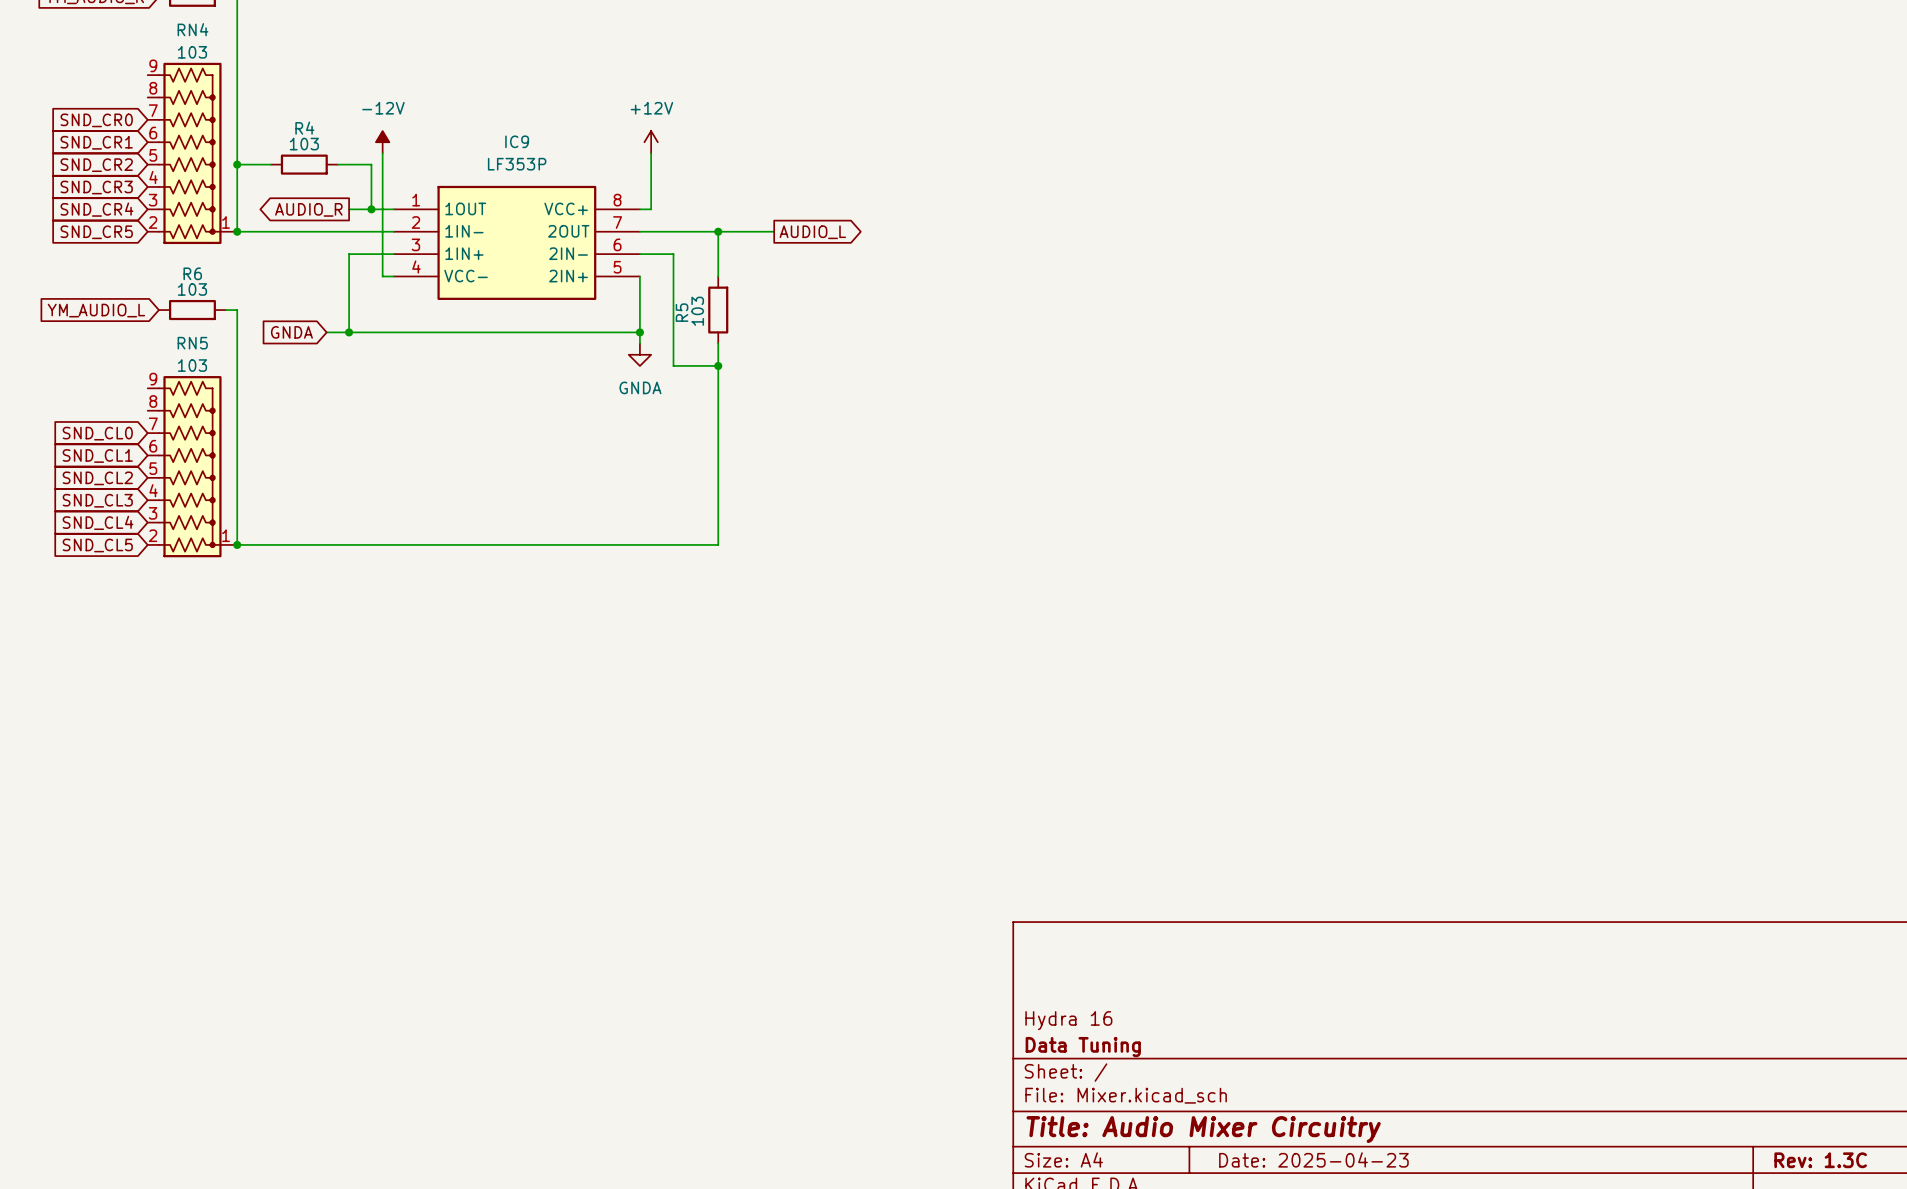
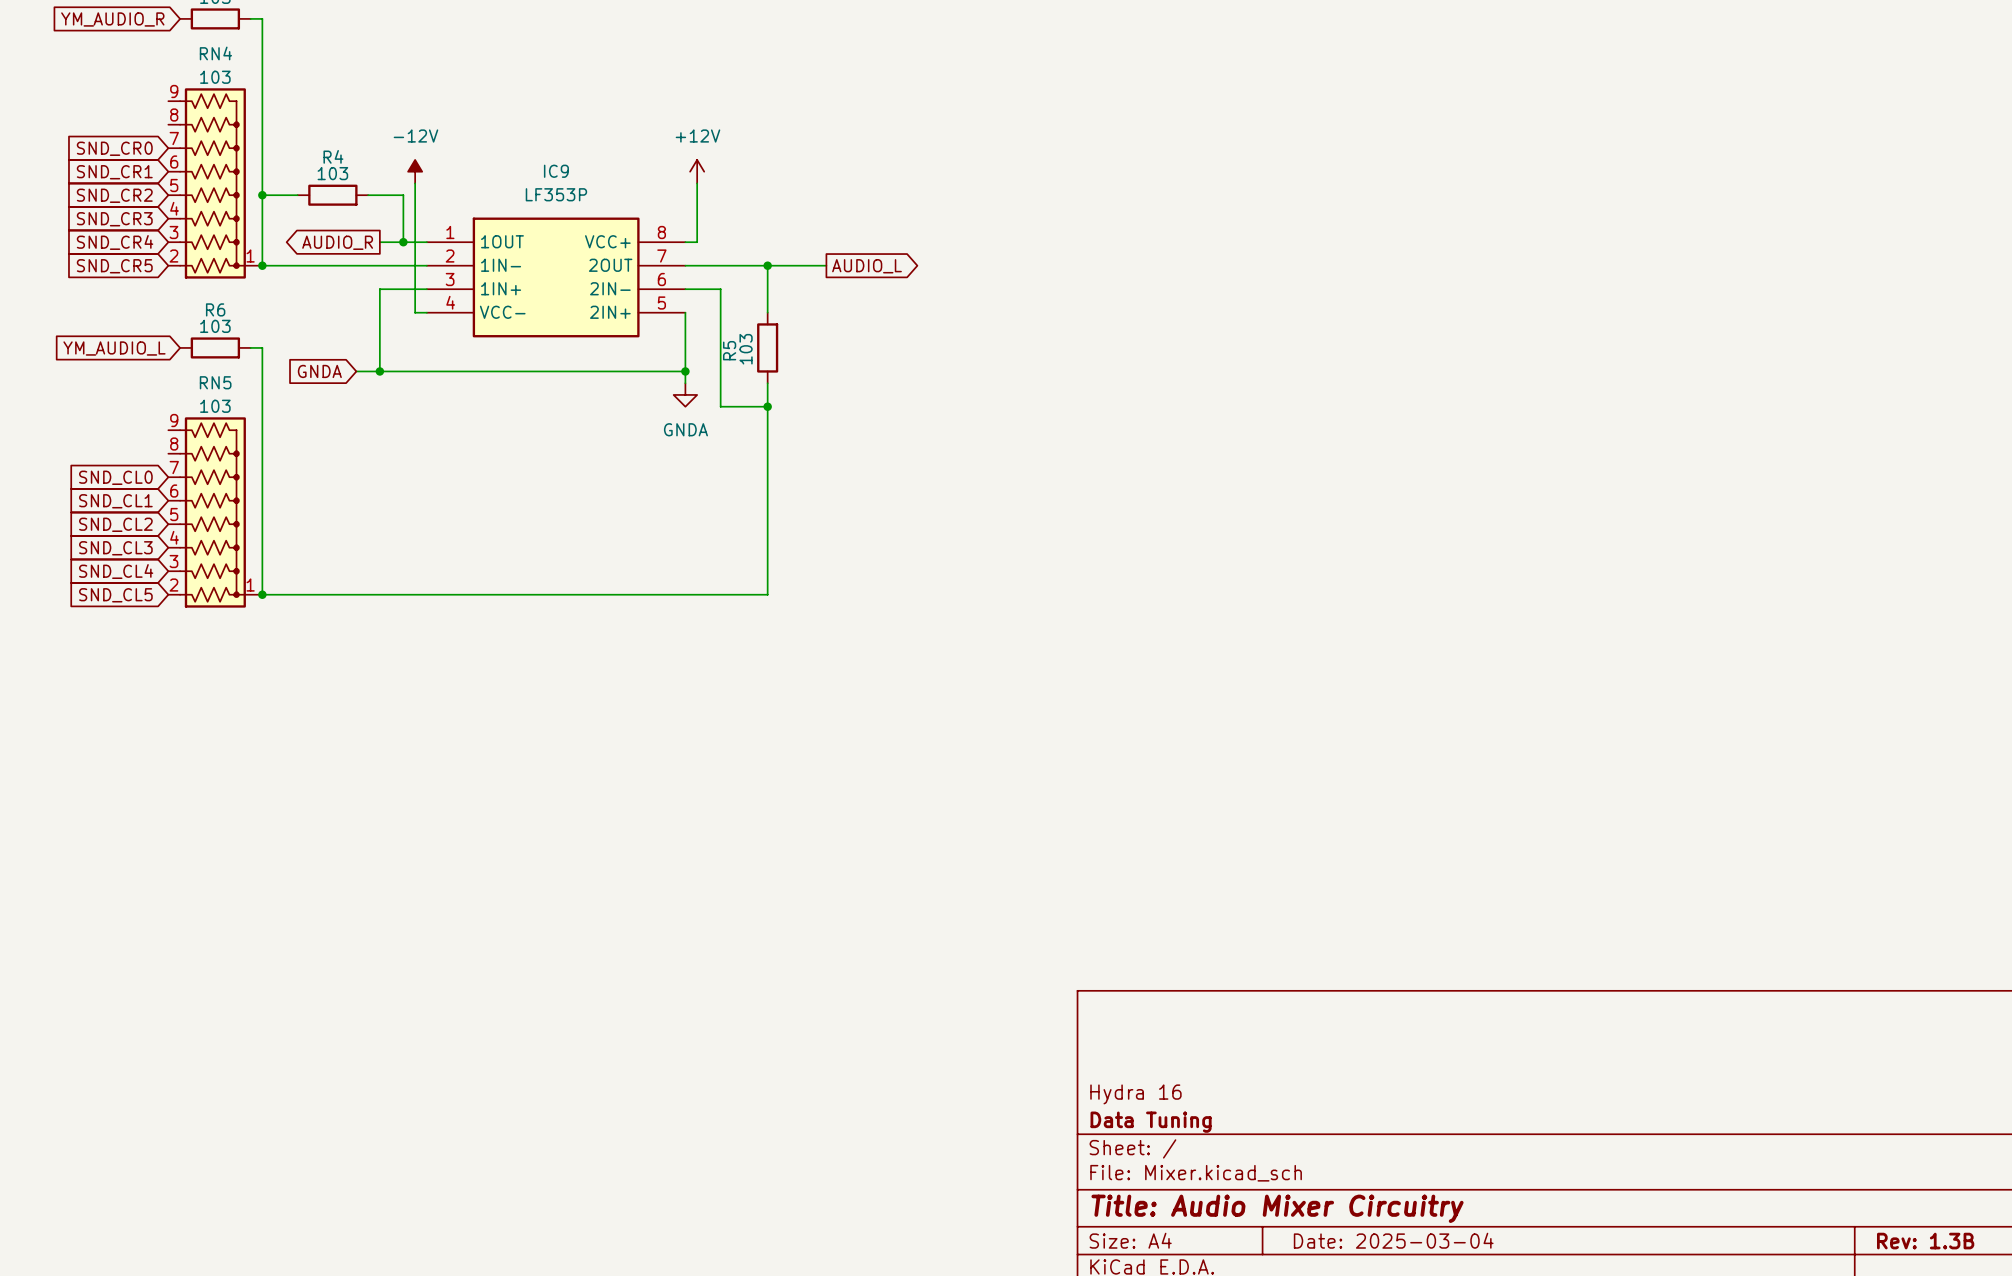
title block: Date: 2025-04-23 (1313, 1159) -> Date: 2025-03-04 (1393, 1240)
title block: Rev: 1.3C (1820, 1160) -> Rev: 1.3B (1925, 1241)

